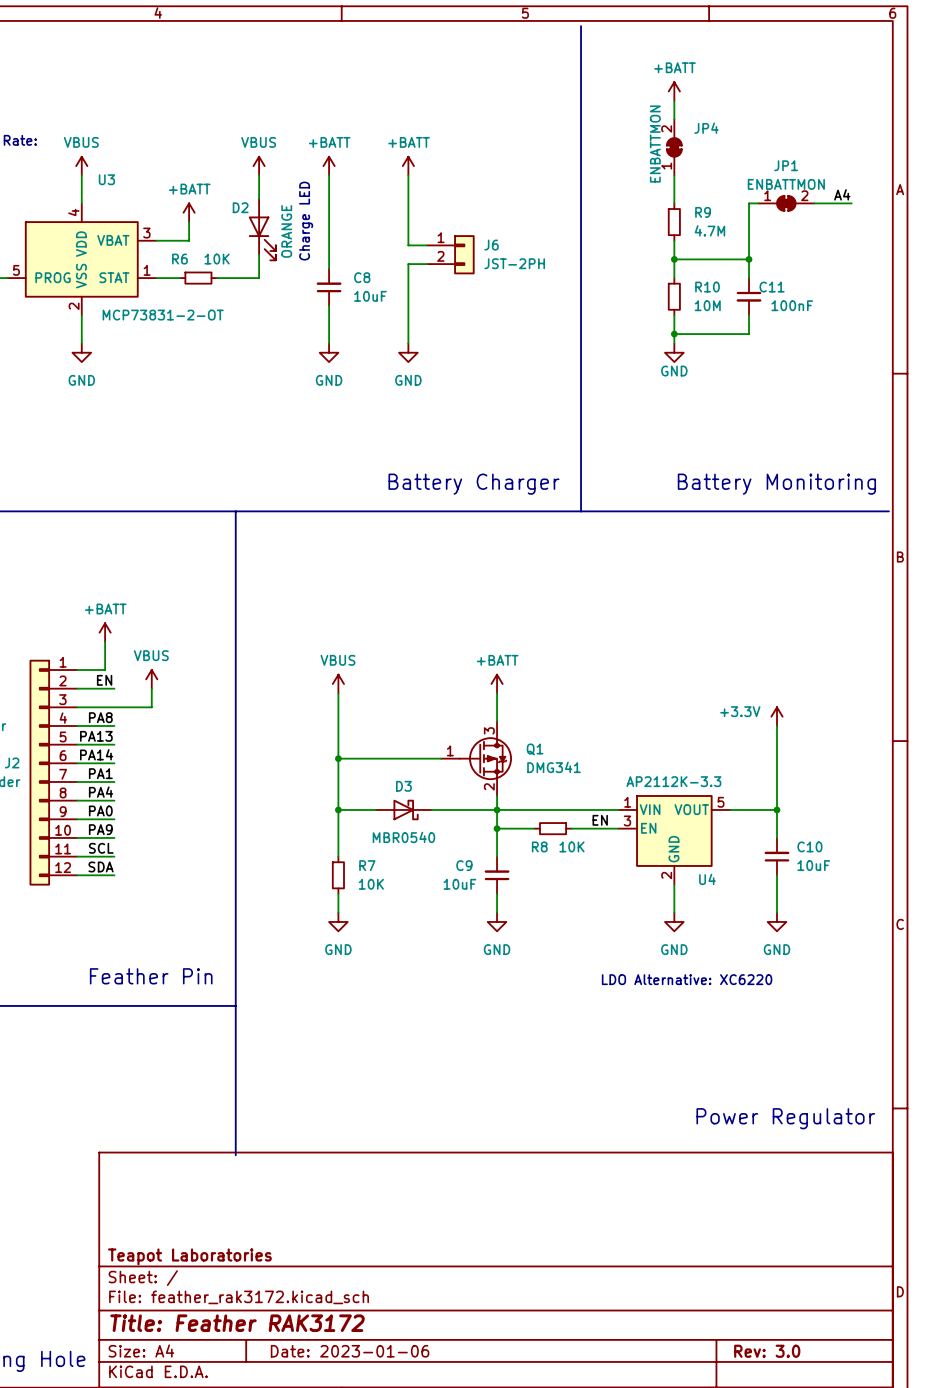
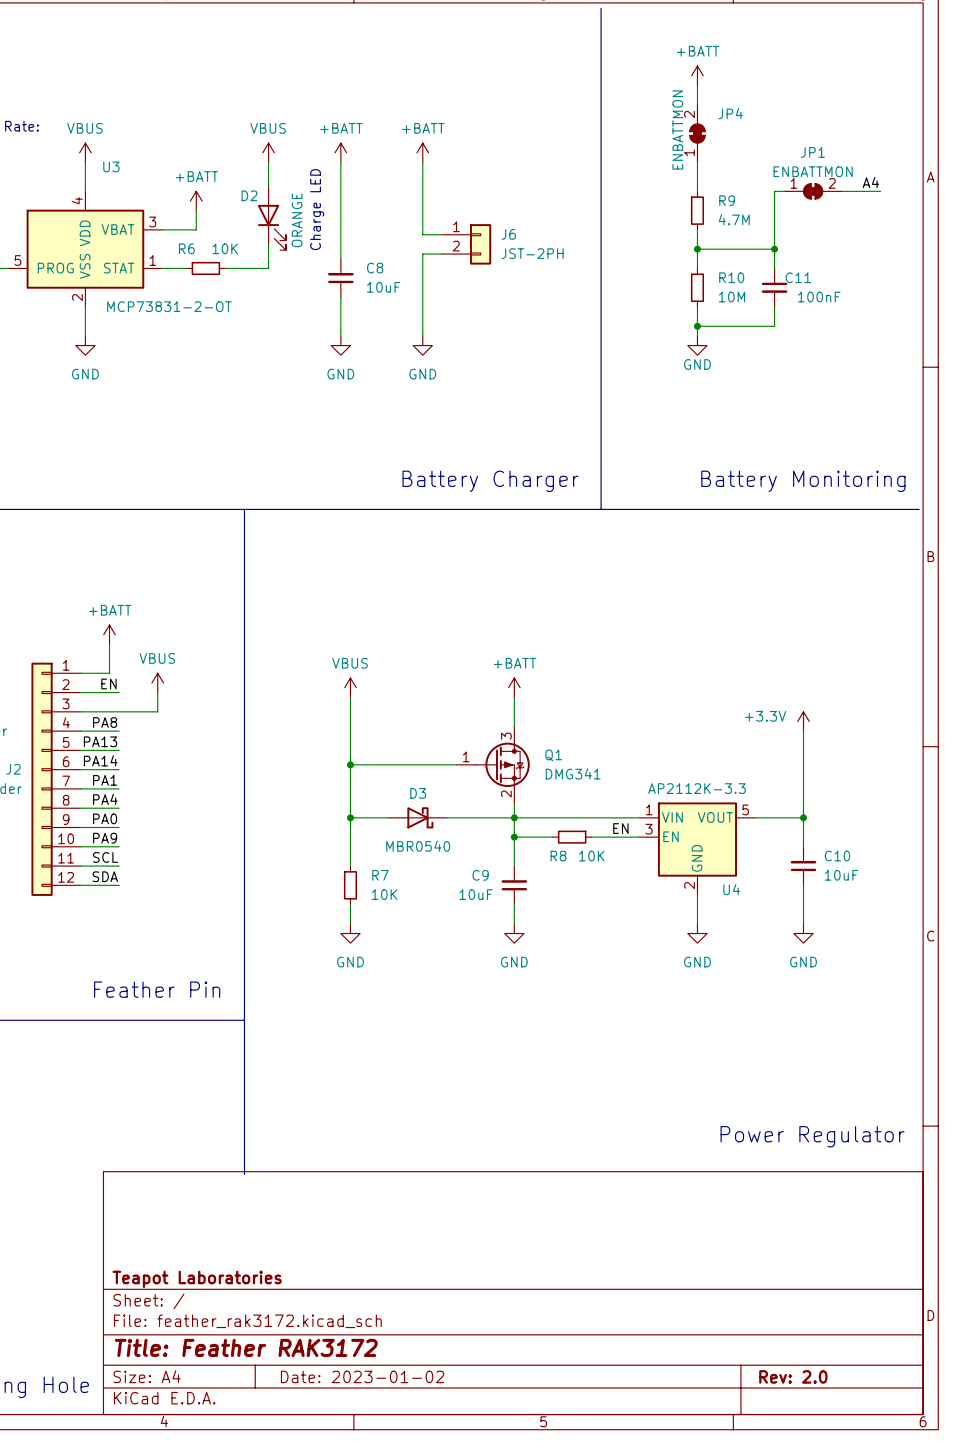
text: LDO Alternative: XC6220 (687, 979) -> none
title block: Date: 2023-01-06 (350, 1351) -> Date: 2023-01-02 (362, 1376)
title block: Rev: 3.0 (767, 1351) -> Rev: 2.0 (793, 1376)

